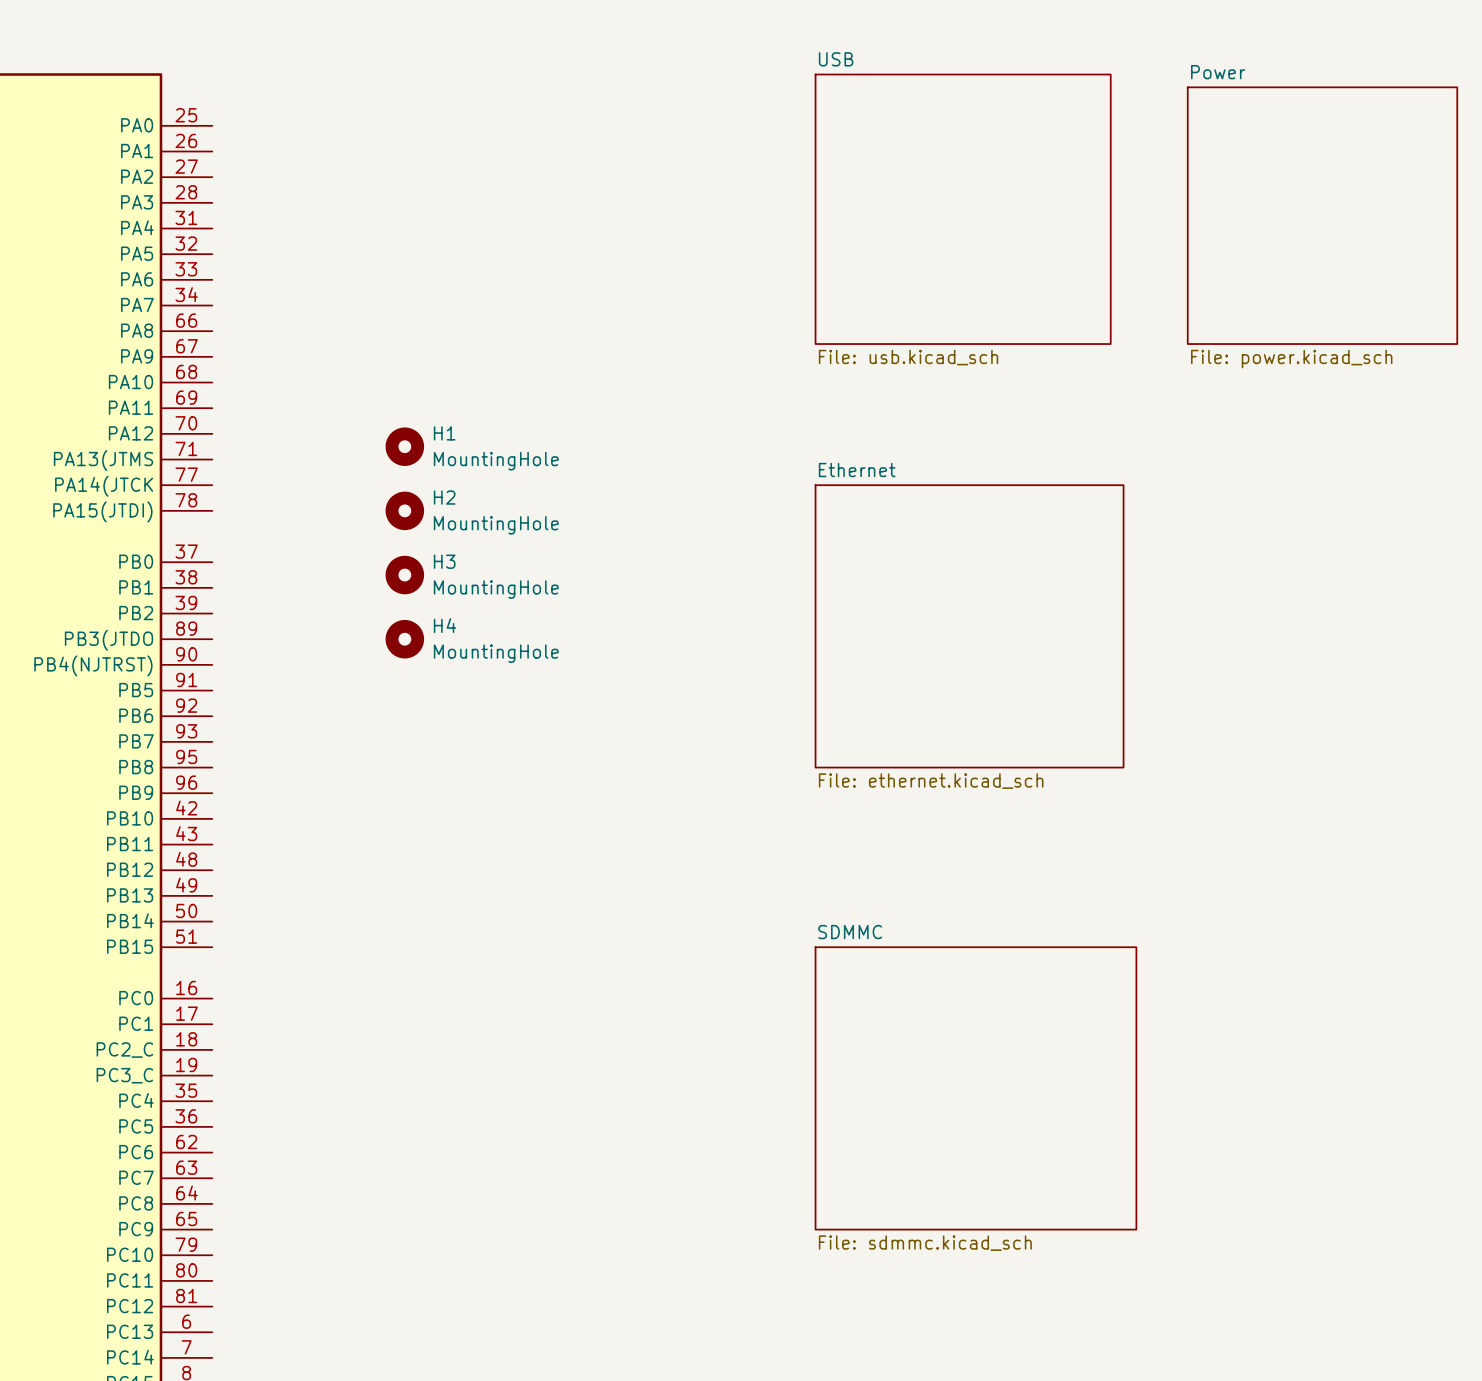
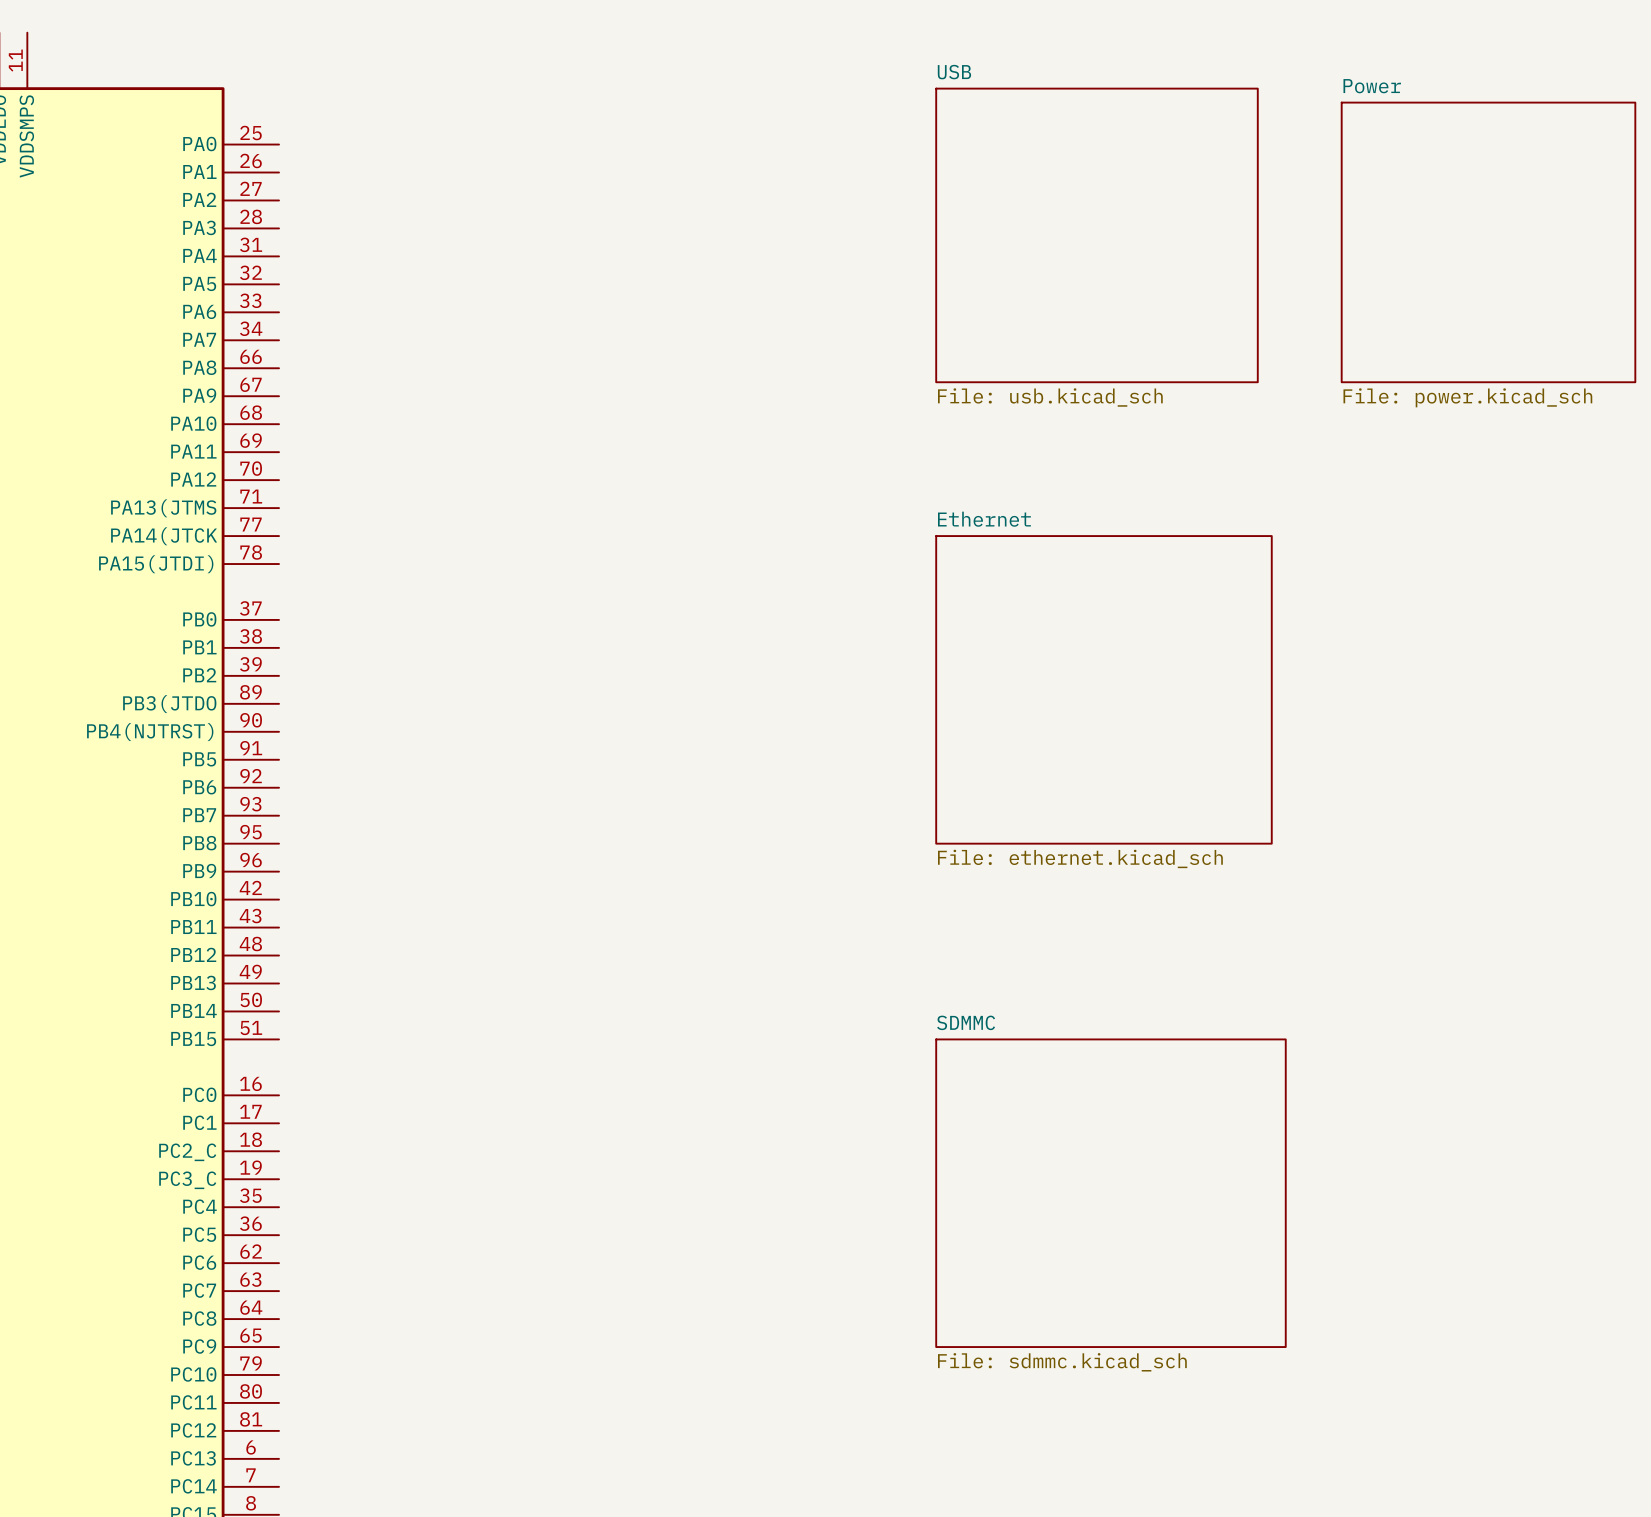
H1: MountingHole (404, 446) -> none
H2: MountingHole (404, 510) -> none
H3: MountingHole (404, 575) -> none
H4: MountingHole (404, 639) -> none

